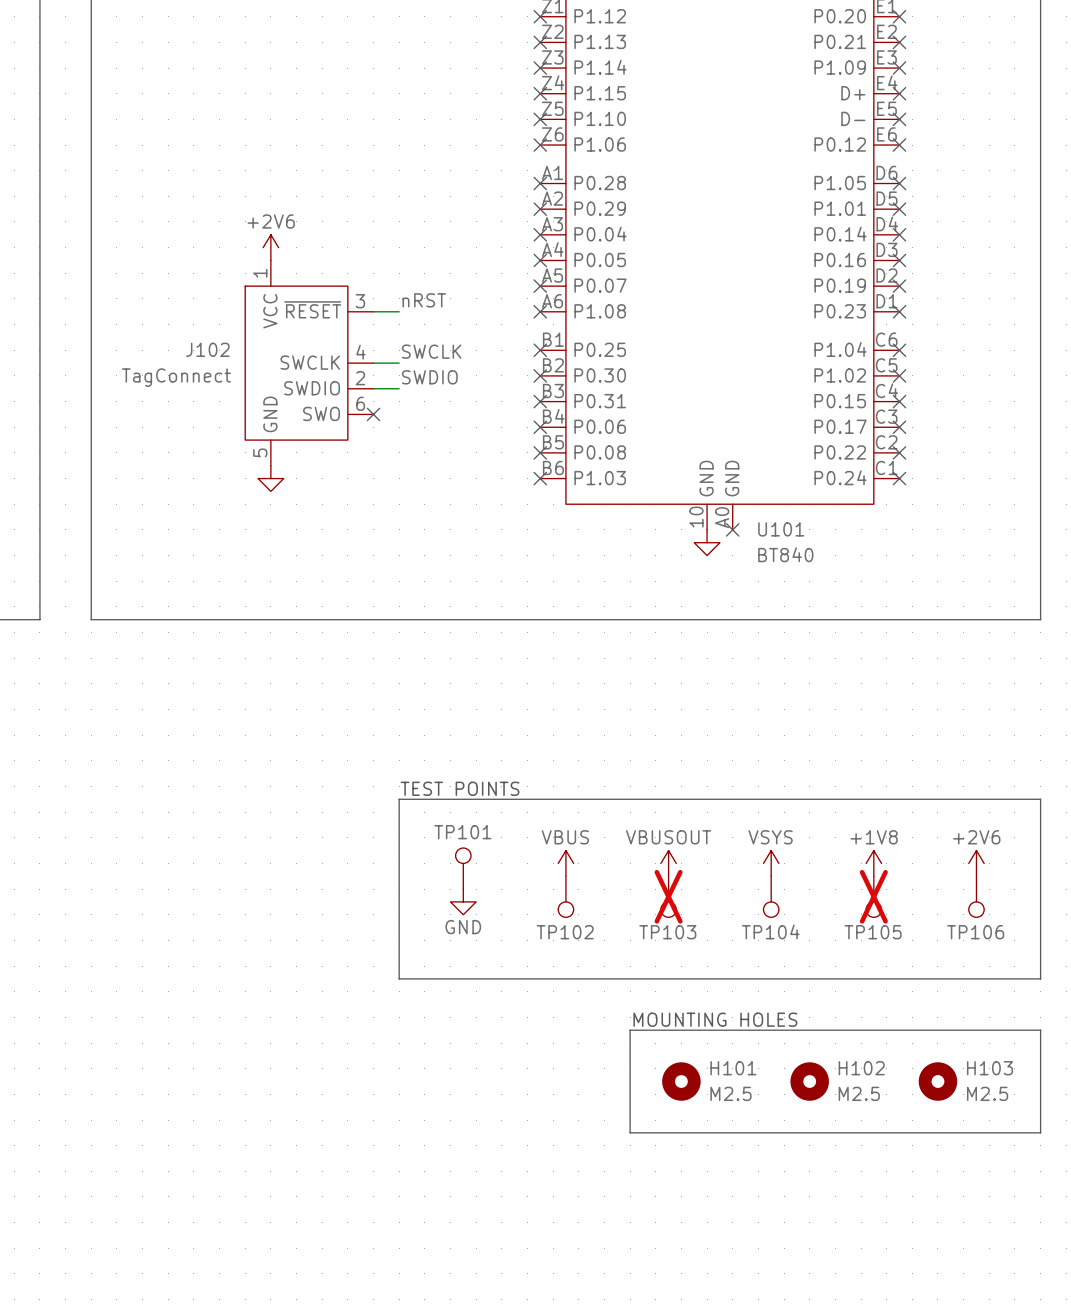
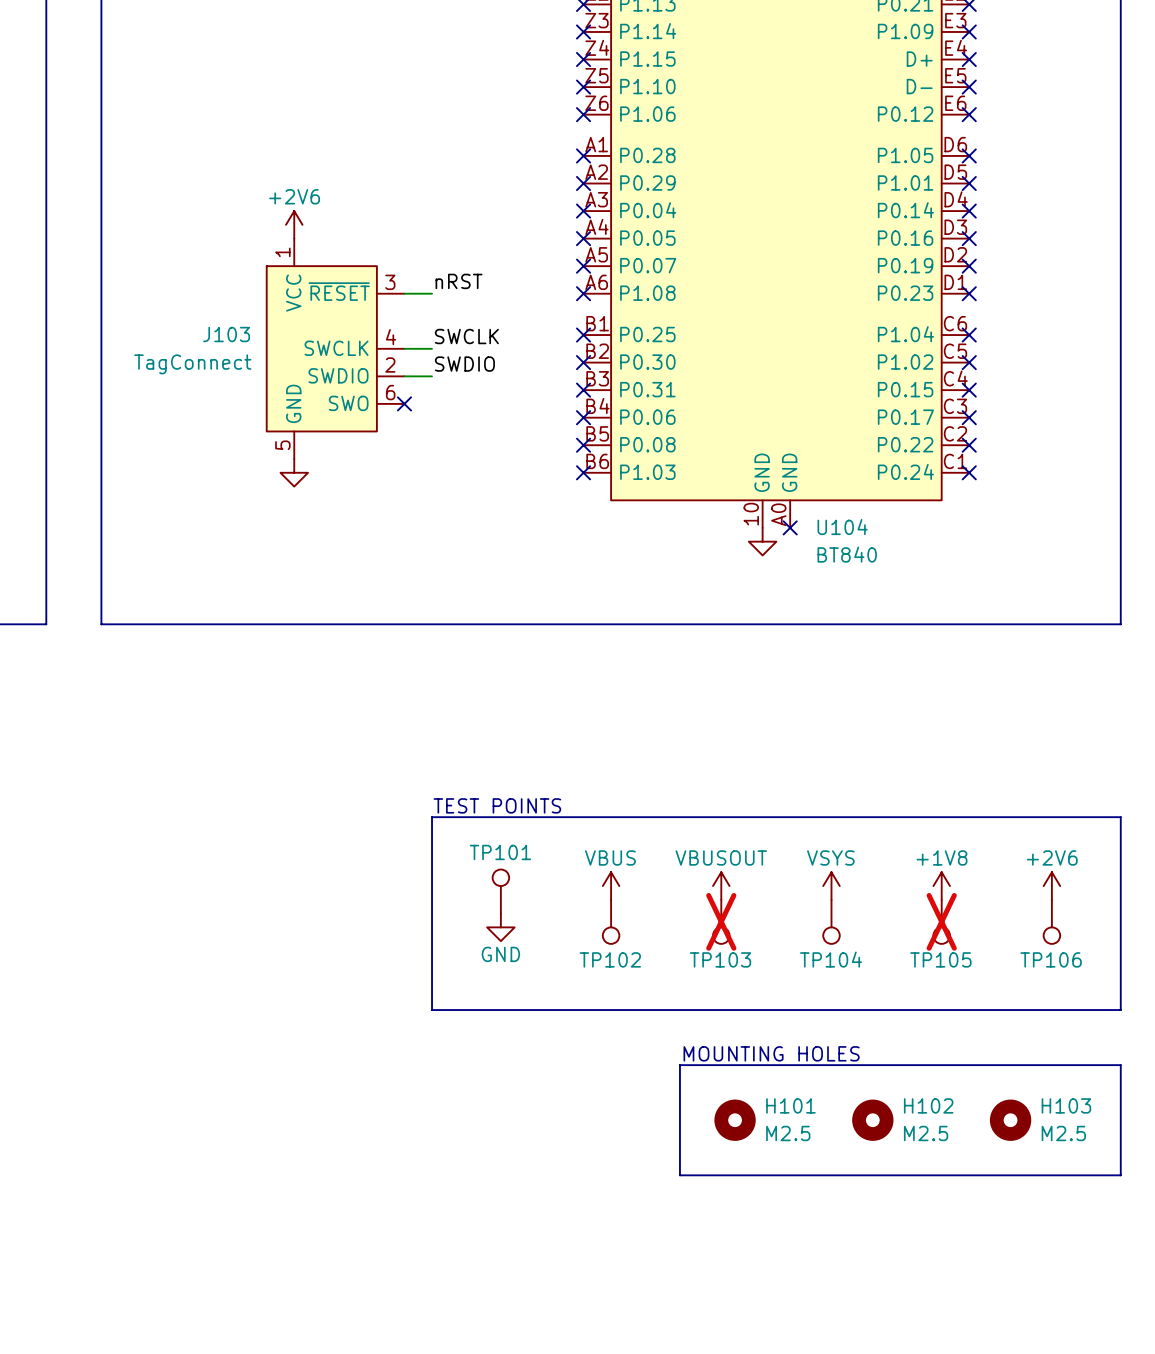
J102 name: J102 (207, 349) -> J103 (226, 334)
U101 name: U101 (781, 529) -> U104 (842, 527)

